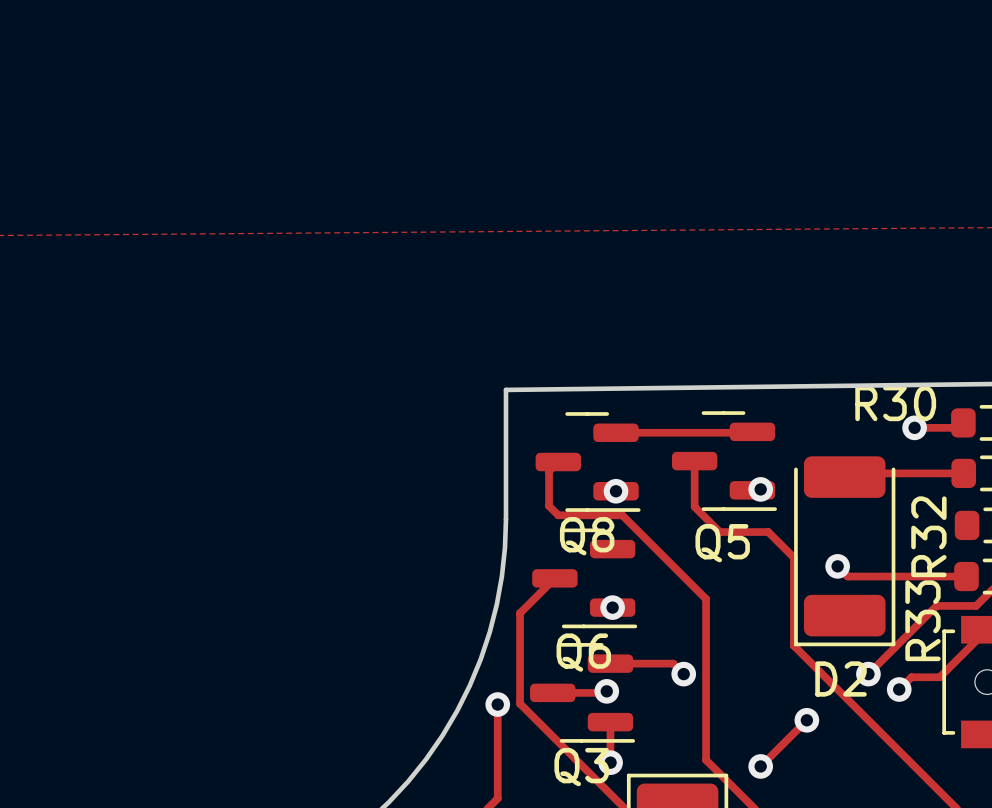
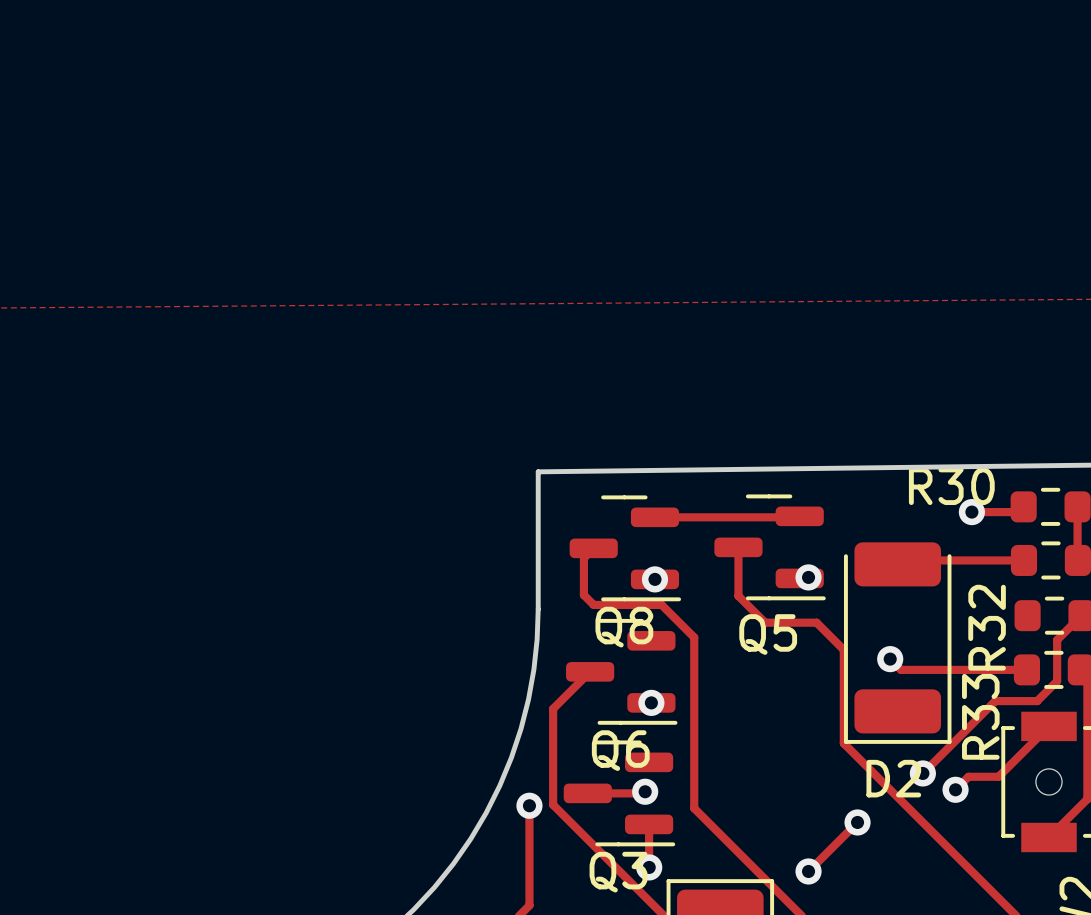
track: (653, 545) (706, 599) (706, 760) -> (694, 637) (694, 808) (750, 864)
track: (610, 663) (673, 663) (683, 674) -> none
via: (683, 674) -> none

